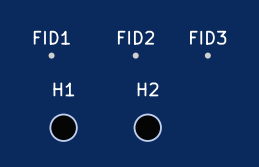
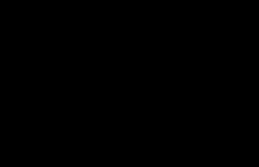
FID1: (51, 55) -> none
FID2: (135, 55) -> none
FID3: (207, 55) -> none
H1: (63, 127) -> none
H2: (147, 127) -> none

